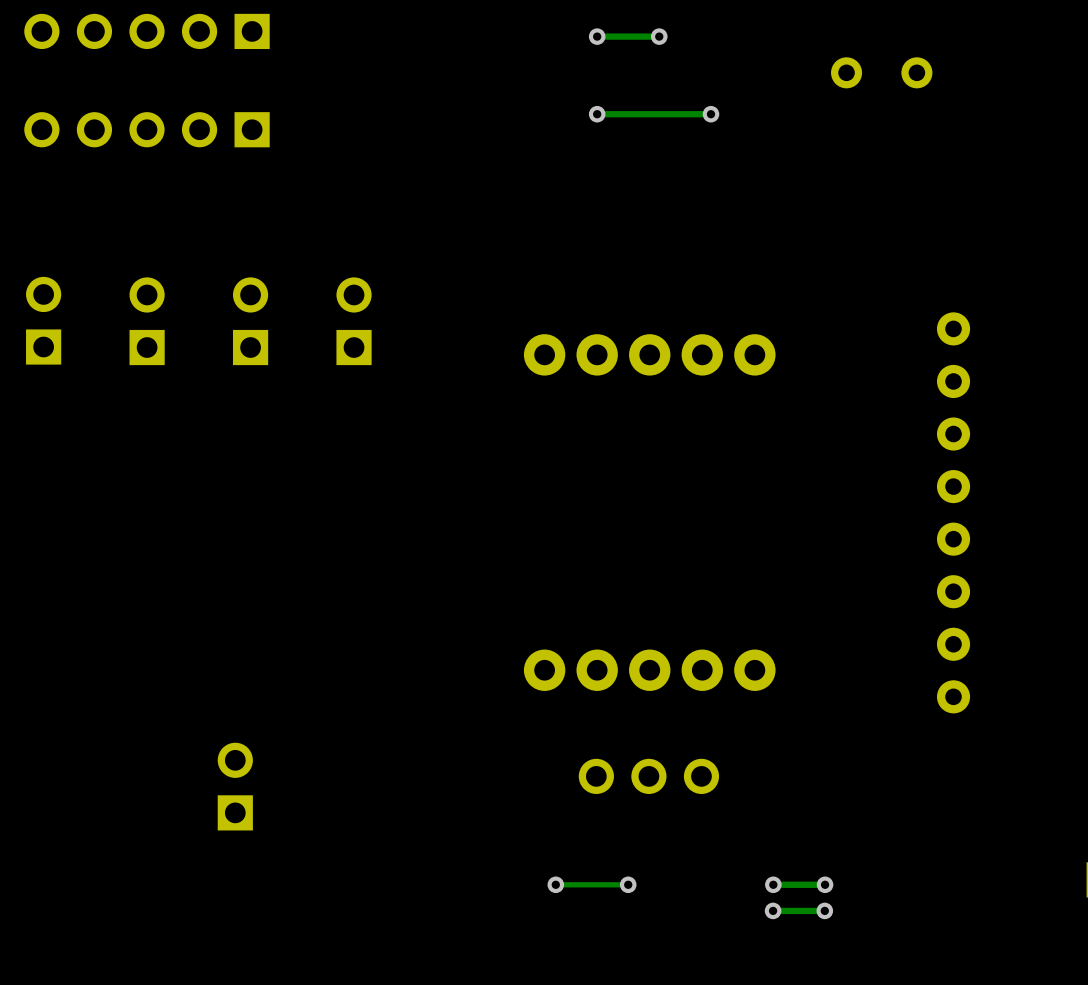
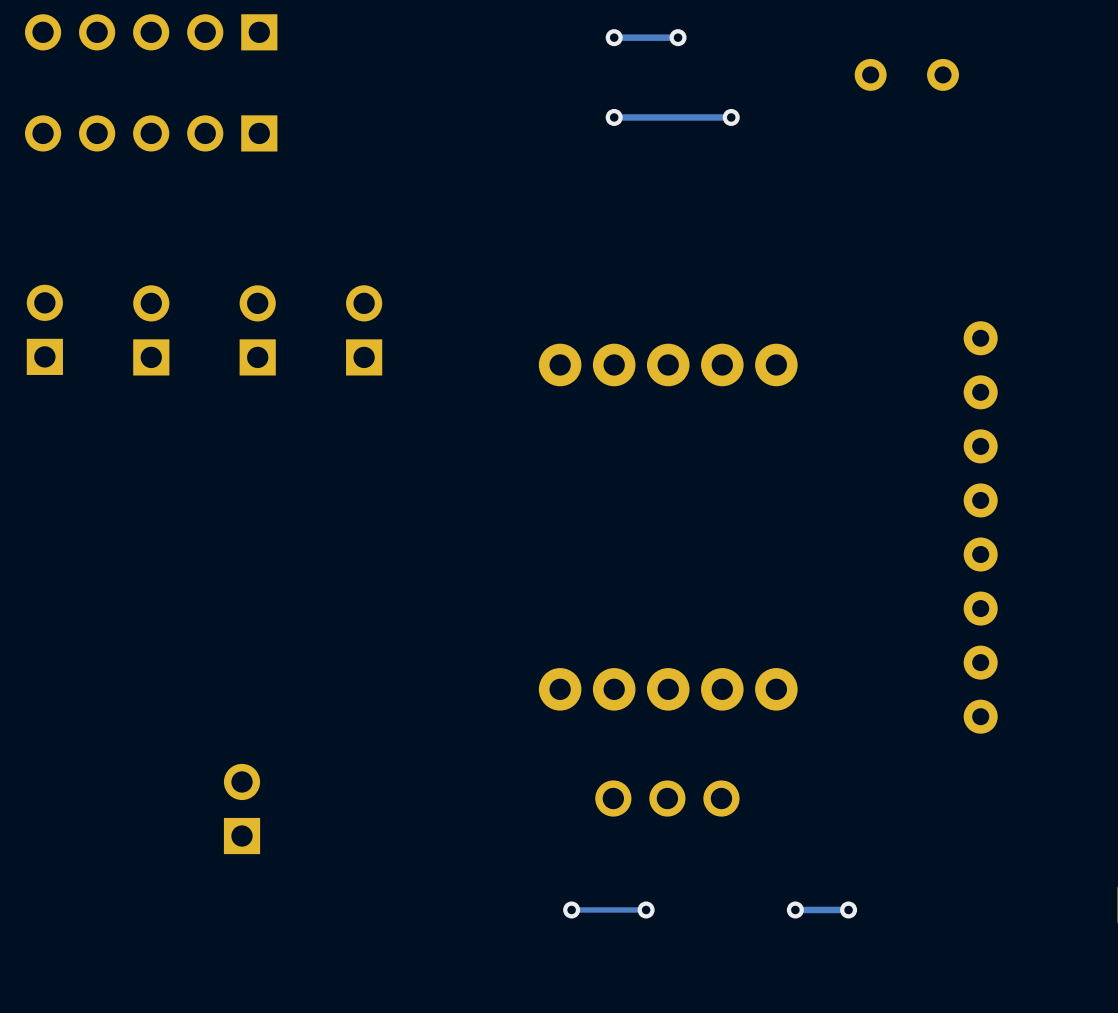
via: (773, 910) -> none
track: (824, 910) (773, 910) -> none
via: (824, 910) -> none

